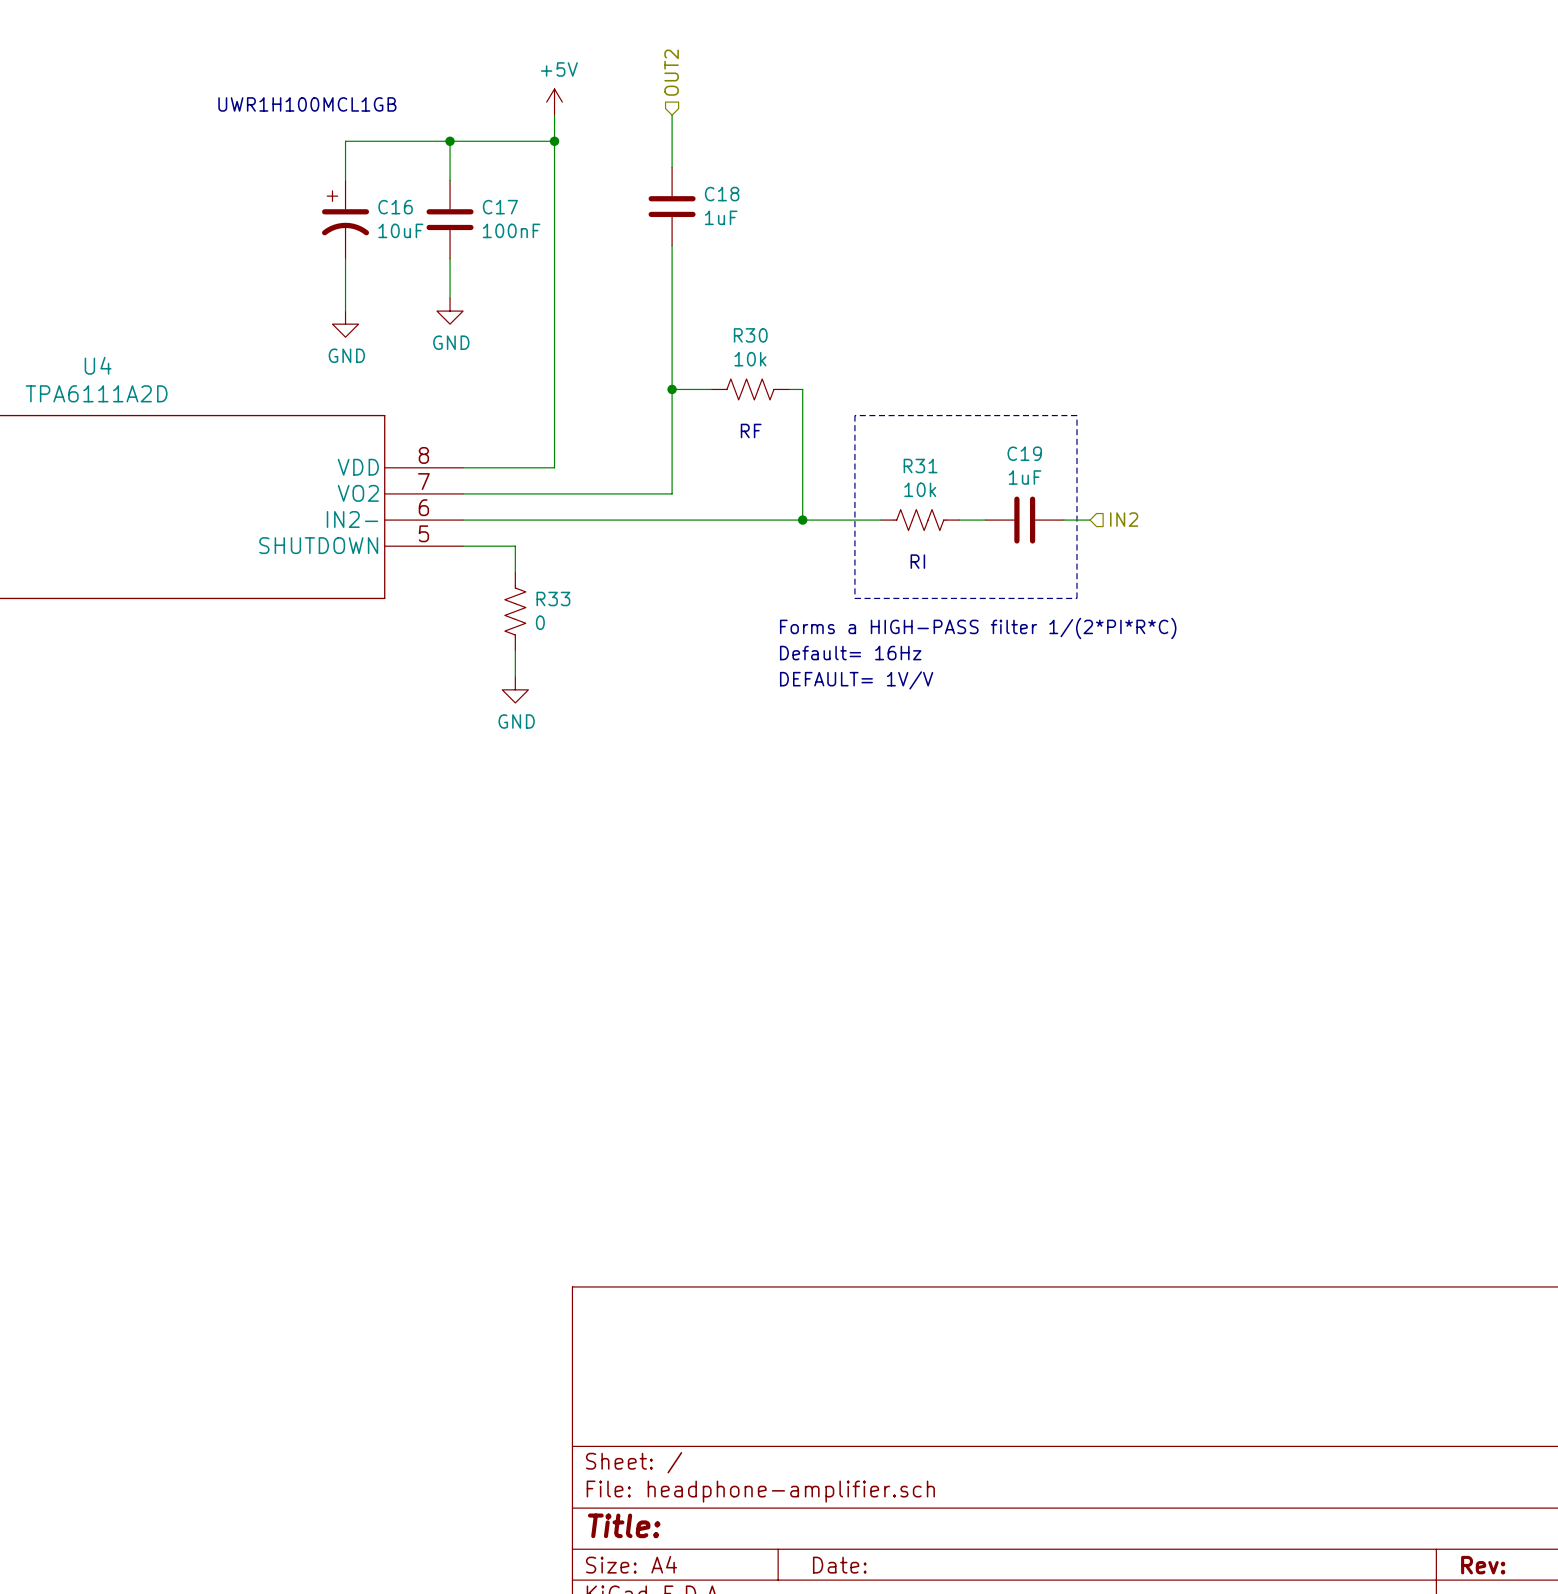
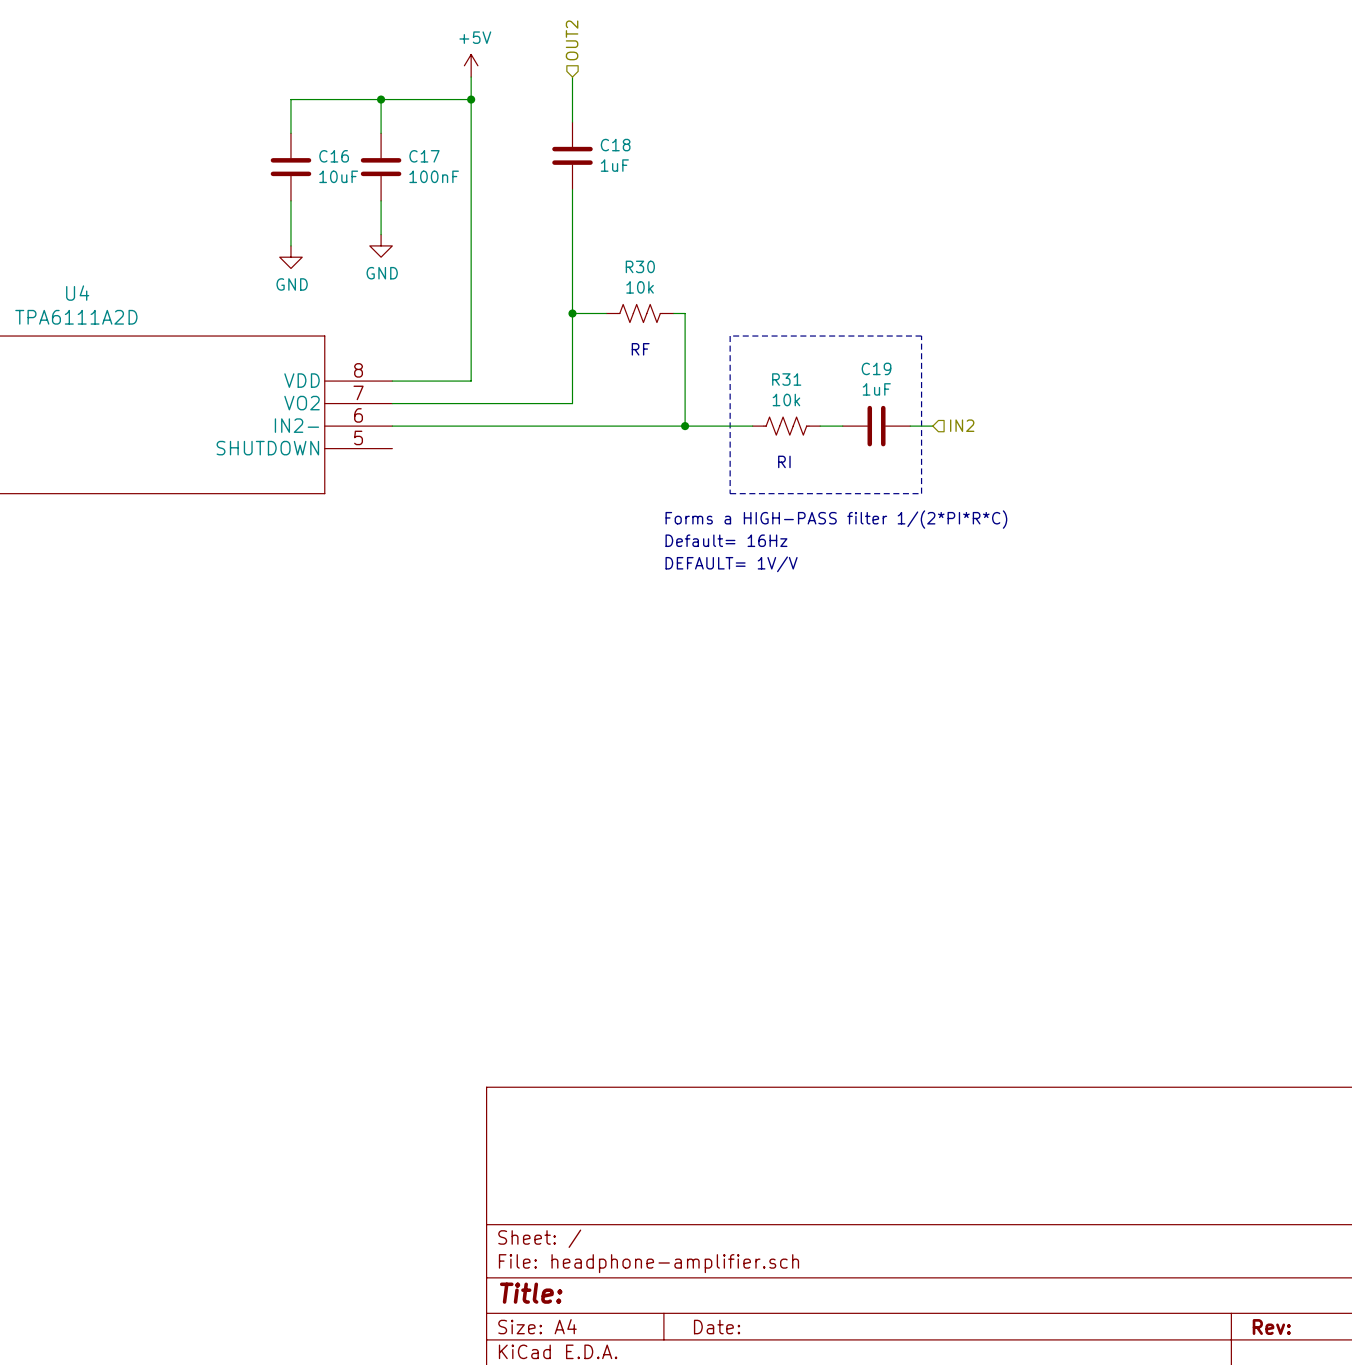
text: UWR1H100MCL1GB (307, 104) -> none
C16 symbol: [322, 180, 370, 259] -> [270, 133, 312, 201]
wire: (463, 546) (515, 546) (515, 572) -> none
R33: 0 (515, 611) -> none
wire: (515, 650) (515, 676) -> none
power symbol: GND (515, 689) -> none

